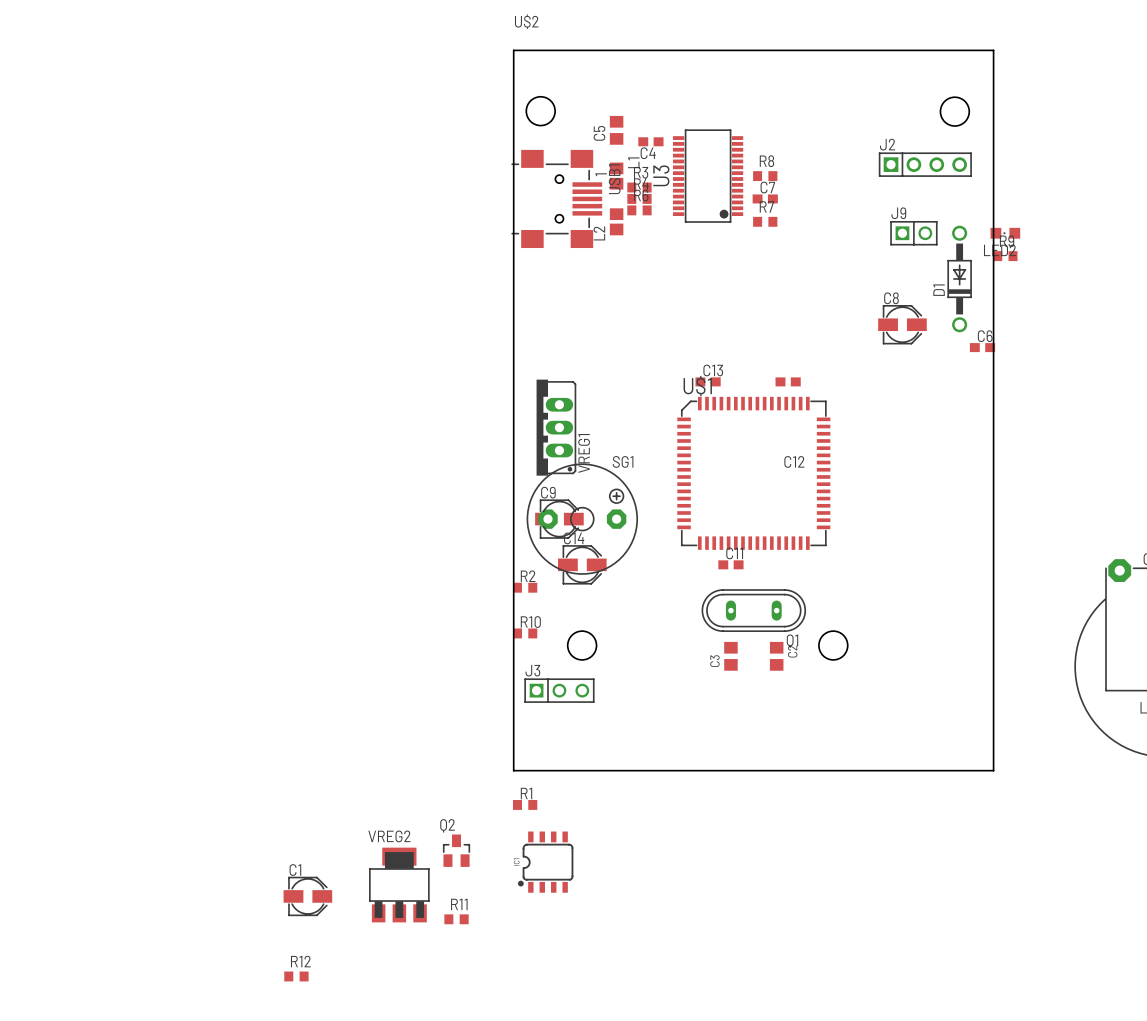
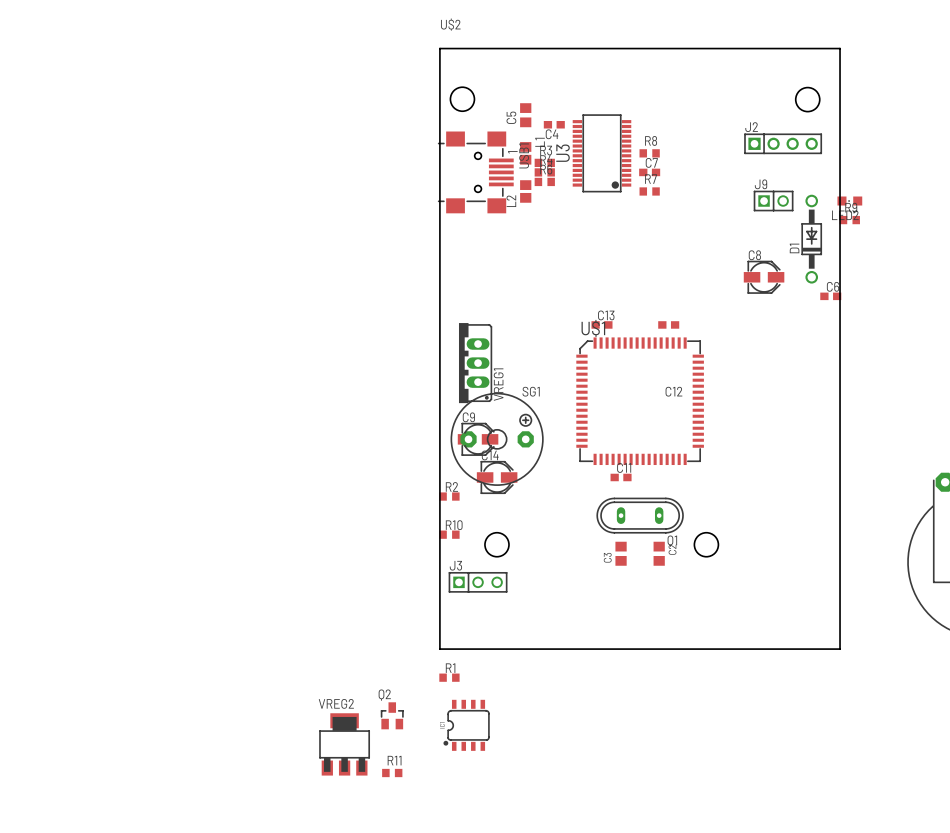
C1: (307, 896) -> none
R12: (296, 976) -> none

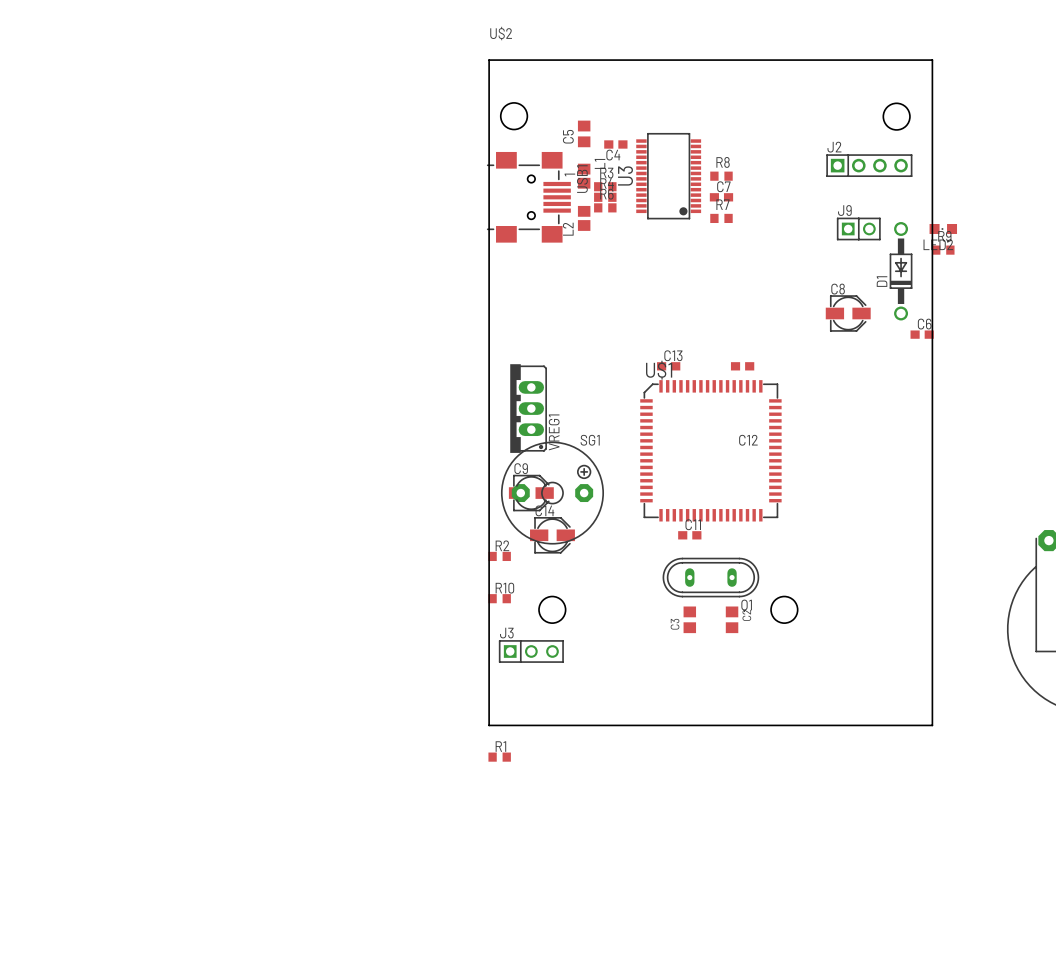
Q2: (392, 715) -> none
part: (466, 725) -> none
VREG2: (344, 744) -> none
R11: (392, 773) -> none

